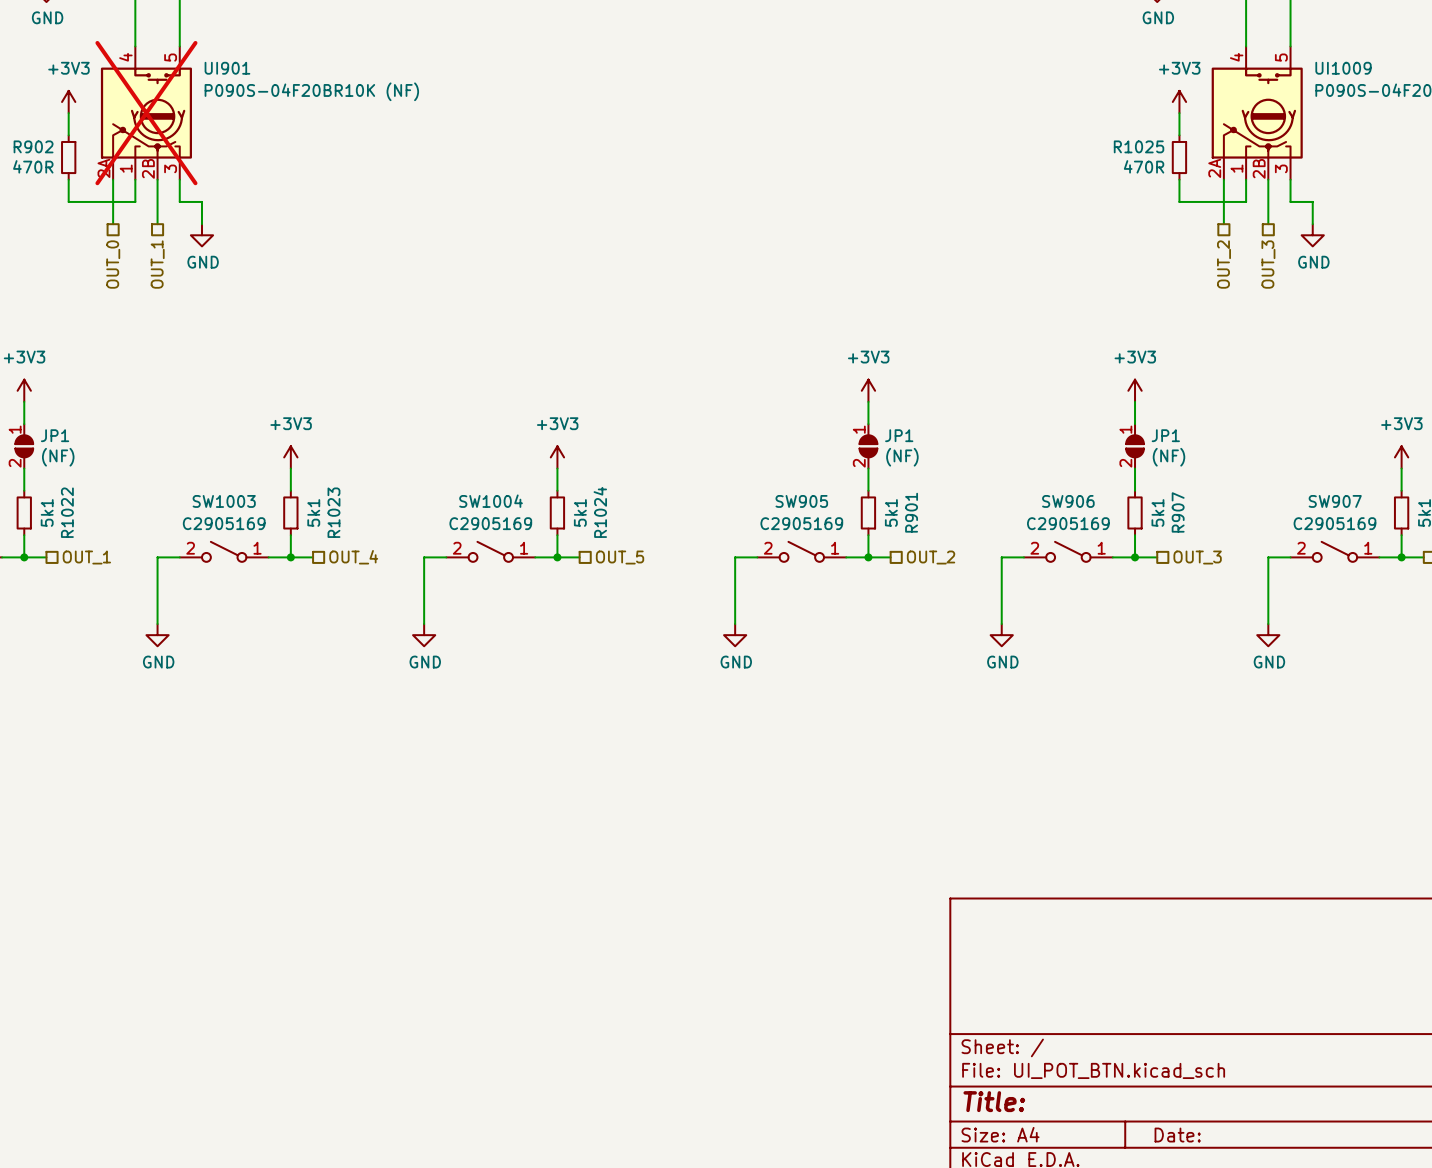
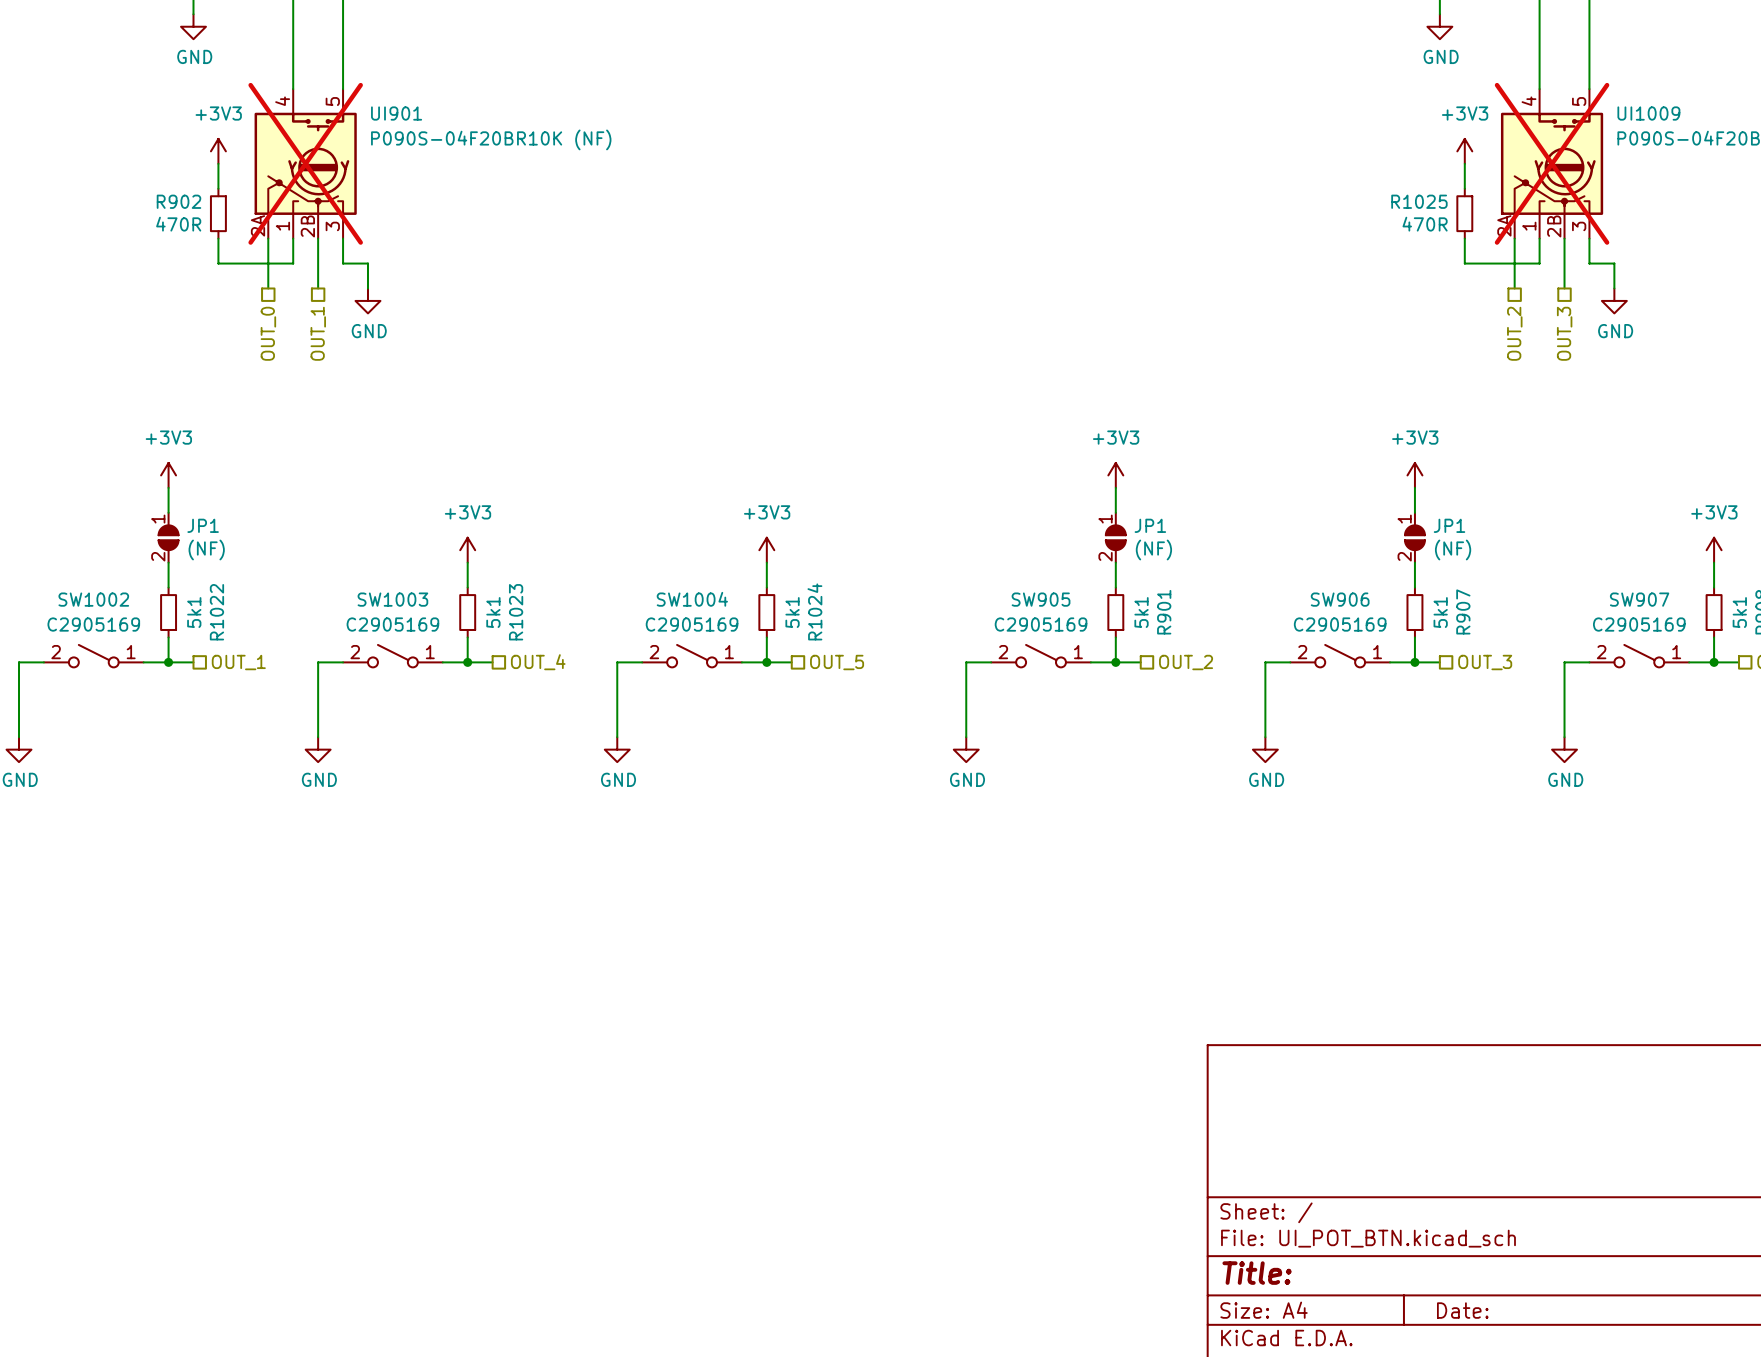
UI1009 do-not-place cross: none -> (1552, 163)

